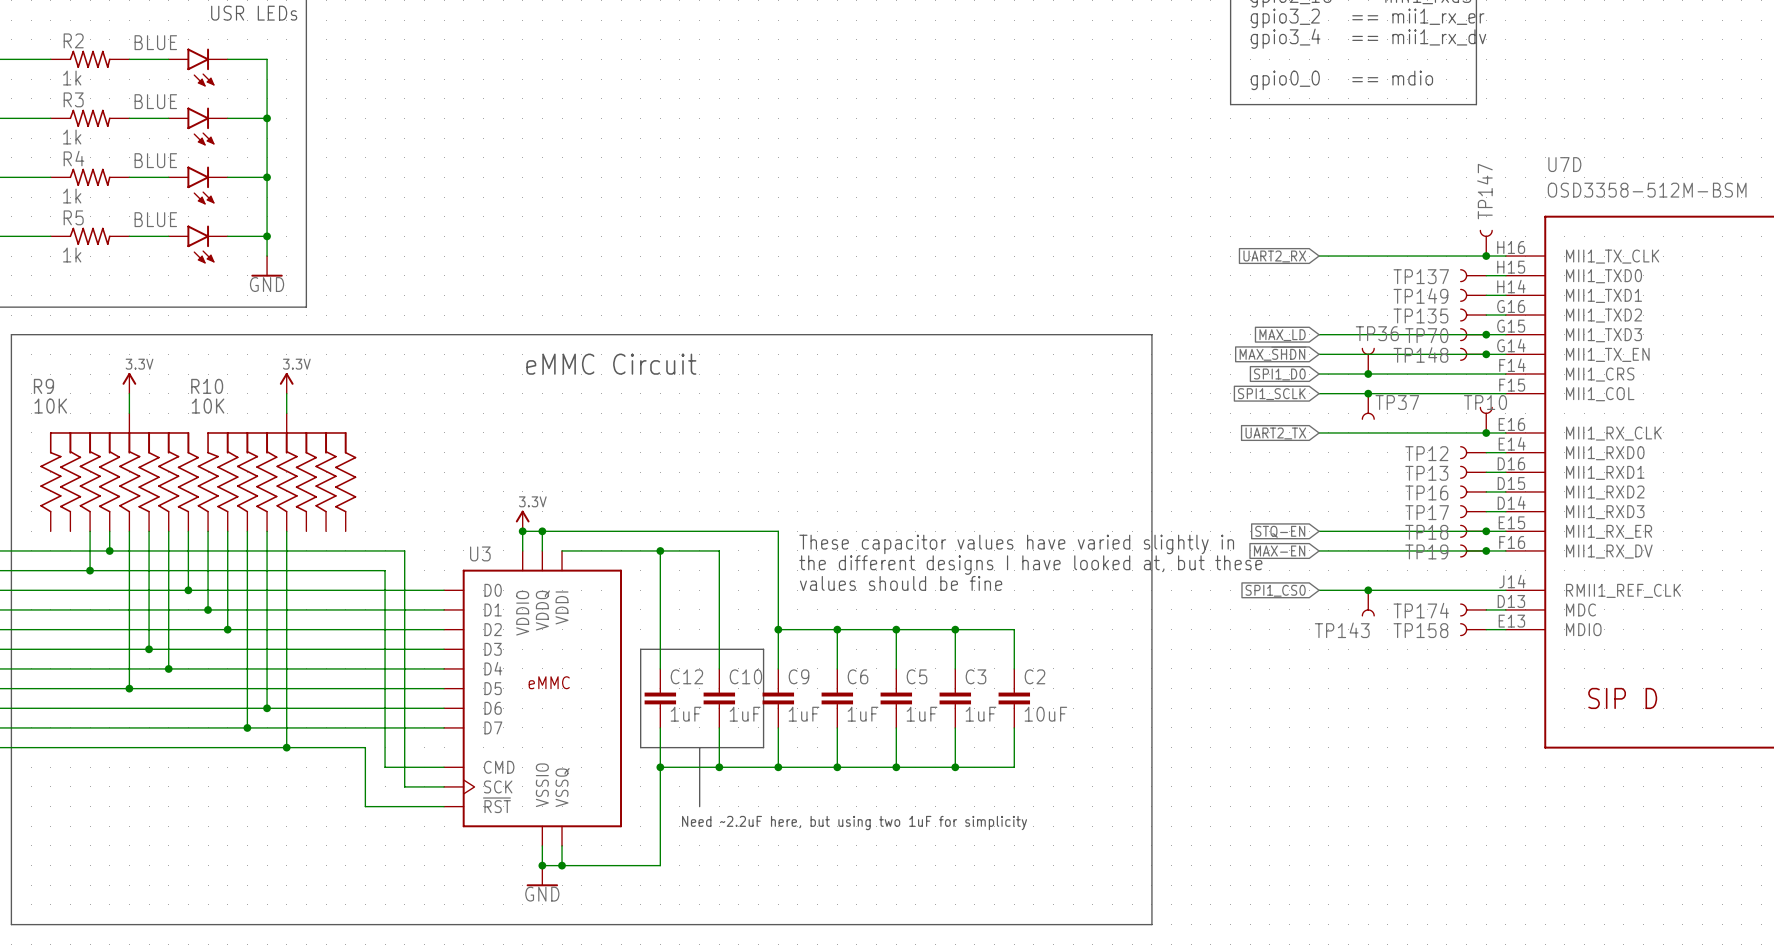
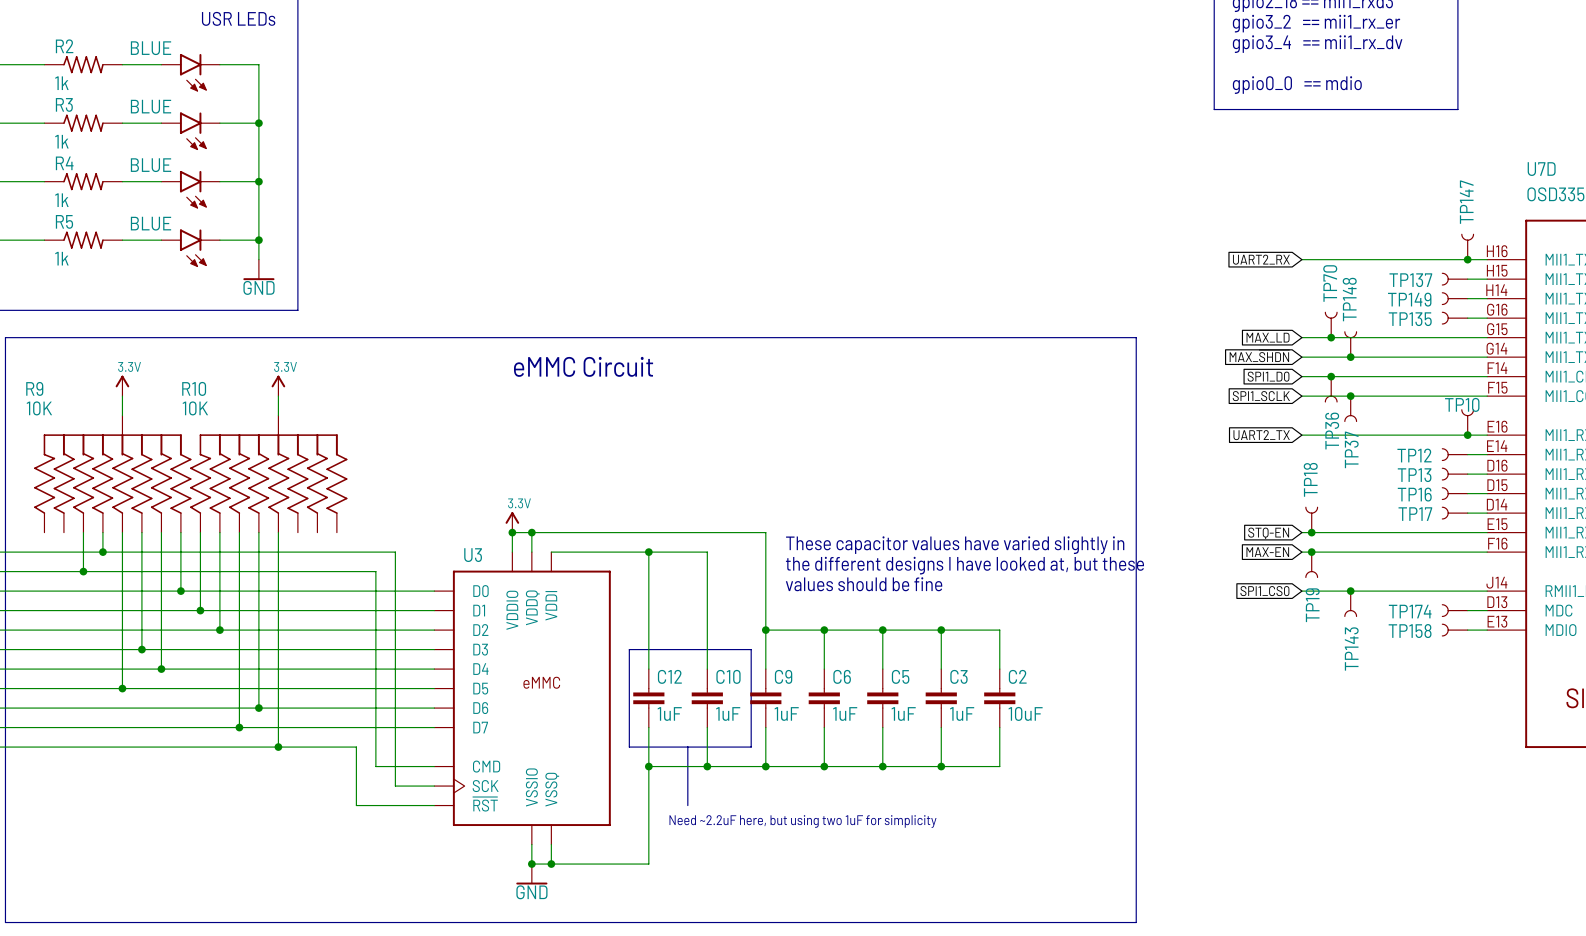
TP36 name position: TP36 (1377, 333) -> TP36 (1332, 431)
junction: none -> (1331, 337)
TP70 rotation: 0° (1473, 334) -> 90° clockwise (1331, 324)
TP70 position: (1473, 334) -> (1331, 324)
junction: (1486, 334) -> none
junction: none -> (1350, 357)
TP148 rotation: 0° (1473, 354) -> 90° clockwise (1350, 344)
TP148 position: (1473, 354) -> (1350, 344)
junction: (1486, 354) -> none
TP36 rotation: 0° (1368, 361) -> 180° (1331, 389)
TP36 position: (1368, 361) -> (1331, 389)
junction: none -> (1331, 376)
junction: (1368, 374) -> none
TP37 name rotation: 0° (1397, 402) -> 90° counterclockwise (1351, 449)
TP37 name position: TP37 (1397, 402) -> TP37 (1351, 449)
junction: none -> (1311, 532)
TP18 rotation: 0° (1473, 531) -> 90° clockwise (1311, 519)
TP18 position: (1473, 531) -> (1311, 519)
junction: (1486, 531) -> none
junction: none -> (1311, 552)
TP19 rotation: 0° (1473, 550) -> 90° counterclockwise (1311, 564)
TP19 position: (1473, 550) -> (1311, 564)
junction: (1486, 550) -> none
TP143 name rotation: 0° (1342, 630) -> 90° counterclockwise (1351, 648)

